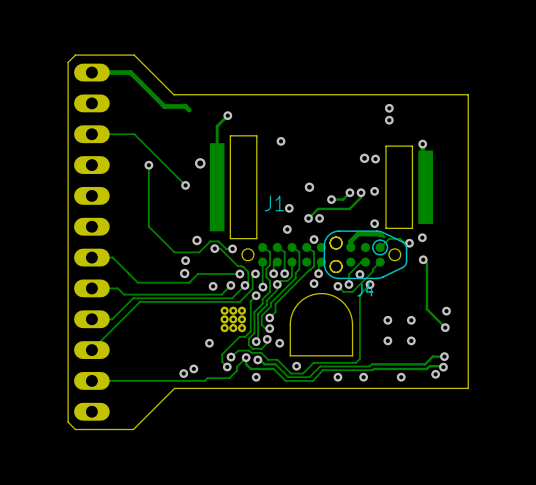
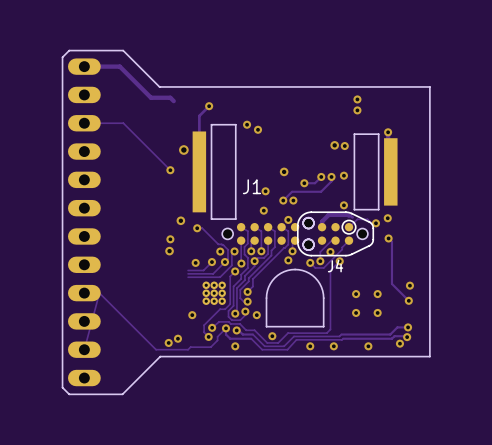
via: none -> (247, 124)
track: (148, 165) (148, 226) (174, 252) (199, 252) (210, 241) (218, 241) (226, 248) (232, 248) -> none
via: (148, 165) -> none
via: (232, 248) -> none
track: (91, 257) (112, 257) (137, 282) (189, 282) (197, 274) (239, 274) -> none
track: (91, 288) (117, 288) (124, 294) (204, 294) -> none
track: (204, 298) (133, 298) (112, 319) (92, 319) -> none
track: (204, 301) (140, 301) (91, 350) -> none
track: (169, 380) (91, 380) -> (156, 349) (99, 293) (84, 349)

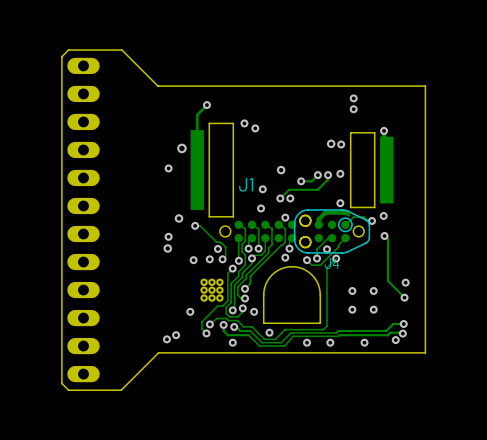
track: (84, 66) (119, 66) (151, 97) (170, 97) (173, 101) -> none
track: (84, 123) (123, 123) (170, 170) -> none
track: (234, 251) (231, 254) (231, 265) (220, 277) (188, 277) -> none
via: (234, 251) -> none
track: (211, 262) (203, 270) (188, 270) -> none
track: (224, 262) (213, 273) (188, 273) -> none
track: (225, 328) (210, 347) (156, 349) (99, 293) (84, 349) -> none

